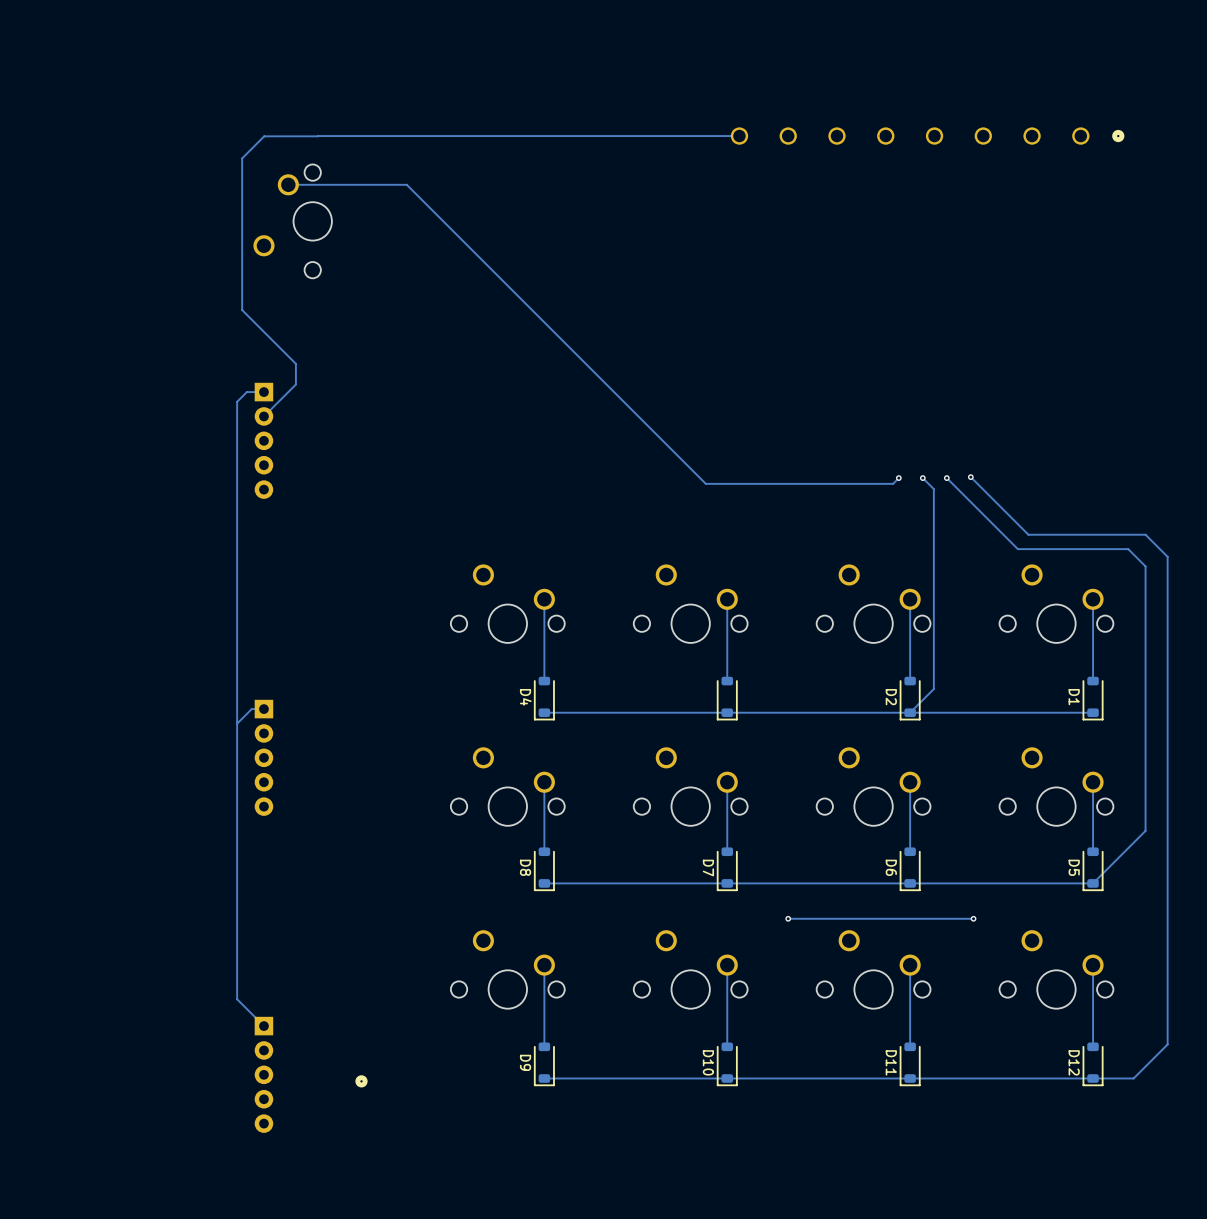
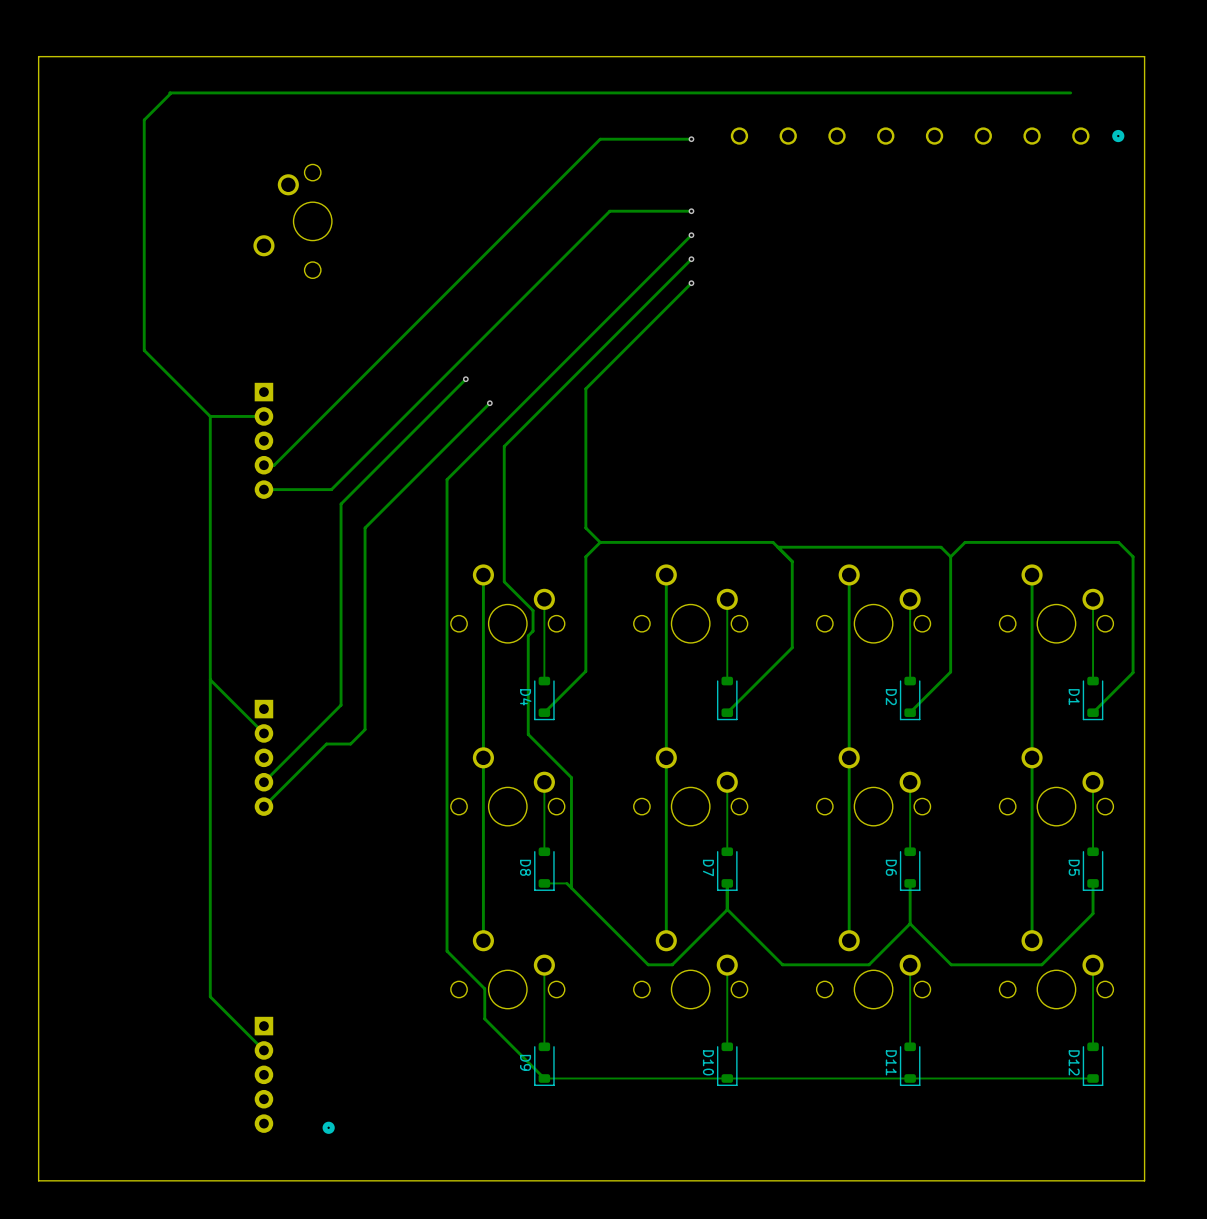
board edge: none -> (1144, 56) (38, 56) (38, 1180) (1144, 1180) (1144, 56)
track: none -> (1070, 92) (169, 92) (144, 120) (144, 350) (210, 416)
track: (739, 136) (264, 136) (242, 158) (242, 310) (295, 363) (295, 384) (263, 416) -> (210, 416) (263, 416)
track: none -> (691, 139) (600, 139) (274, 465) (263, 465)
via: none -> (691, 139)
track: (288, 184) (406, 184) (705, 483) (893, 483) (898, 478) -> none
track: none -> (691, 211) (609, 211) (331, 489) (263, 489)
via: none -> (691, 211)
track: none -> (691, 235) (447, 479) (447, 951) (484, 988) (484, 1018) (544, 1078)
via: none -> (691, 235)
track: none -> (691, 259) (504, 446) (504, 581) (533, 610) (533, 631) (528, 635) (528, 734) (571, 777) (571, 888)
via: none -> (691, 259)
track: none -> (691, 283) (585, 388) (585, 528) (600, 542)
via: none -> (691, 283)
track: none -> (465, 379) (341, 504) (341, 705) (263, 782)
via: none -> (465, 379)
track: (263, 392) (246, 392) (237, 401) (237, 999) (263, 1026) -> none
track: none -> (489, 403) (365, 528) (365, 729) (350, 744) (326, 744) (263, 806)
via: none -> (489, 403)
track: none -> (210, 416) (210, 996) (263, 1050)
track: (970, 477) (1028, 534) (1145, 534) (1167, 556) (1167, 1044) (1133, 1078) (1093, 1078) -> none
via: (970, 477) -> none
via: (898, 478) -> none
track: (922, 478) (933, 489) (933, 689) (910, 712) -> (950, 556) (950, 672) (910, 712)
via: (922, 478) -> none
track: (946, 478) (1017, 549) (1128, 549) (1145, 566) (1145, 830) (1093, 883) (566, 883) -> (727, 883) (727, 909) (672, 964) (648, 964) (566, 883)
via: (946, 478) -> none
track: none -> (600, 542) (773, 542) (792, 561) (792, 647) (727, 712)
track: none -> (600, 542) (585, 556) (585, 671) (544, 712)
track: none -> (777, 547) (941, 547) (950, 556)
track: none -> (483, 574) (483, 940)
track: none -> (666, 574) (666, 940)
track: none -> (849, 574) (849, 940)
track: none -> (1032, 574) (1032, 940)
track: none -> (210, 679) (263, 733)
track: (263, 709) (251, 709) (237, 723) -> none
track: (1093, 712) (544, 712) -> (1093, 712) (1133, 672) (1133, 556) (1118, 542) (965, 542) (950, 556)
track: none -> (910, 883) (910, 923)
track: none -> (1093, 883) (1093, 913) (1041, 964) (951, 964) (910, 923)
track: none -> (727, 909) (782, 964) (869, 964) (910, 923)
via: (788, 918) -> none
track: (973, 918) (788, 918) -> none
via: (973, 918) -> none
part position: (361, 1081) -> (328, 1127)

